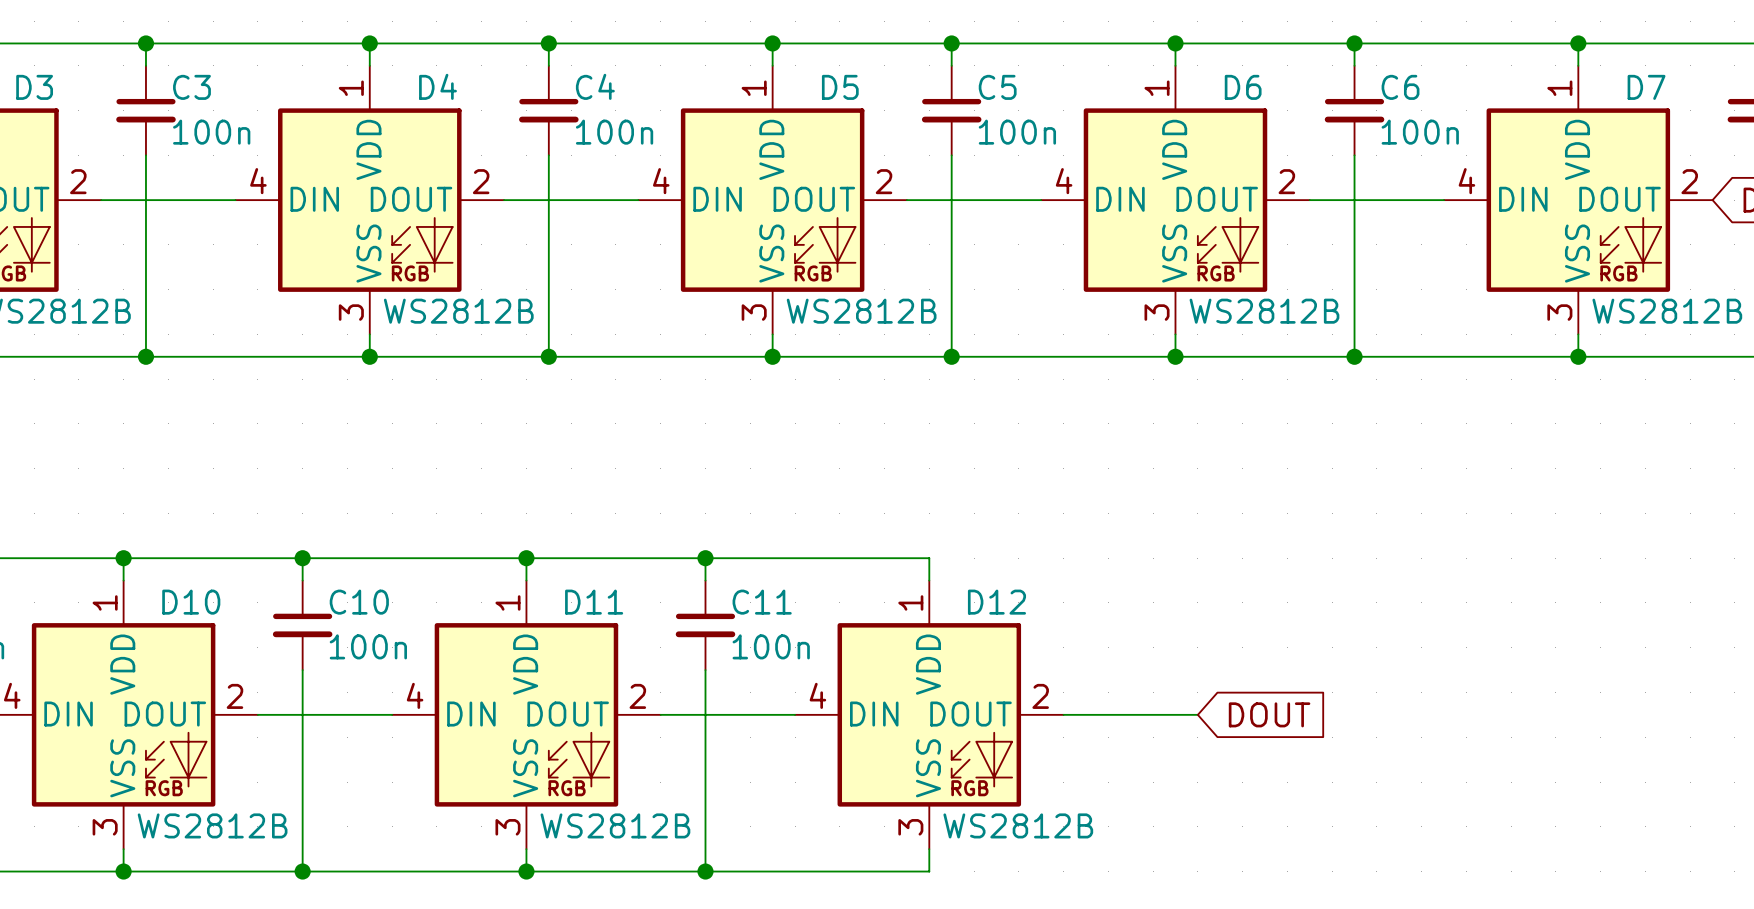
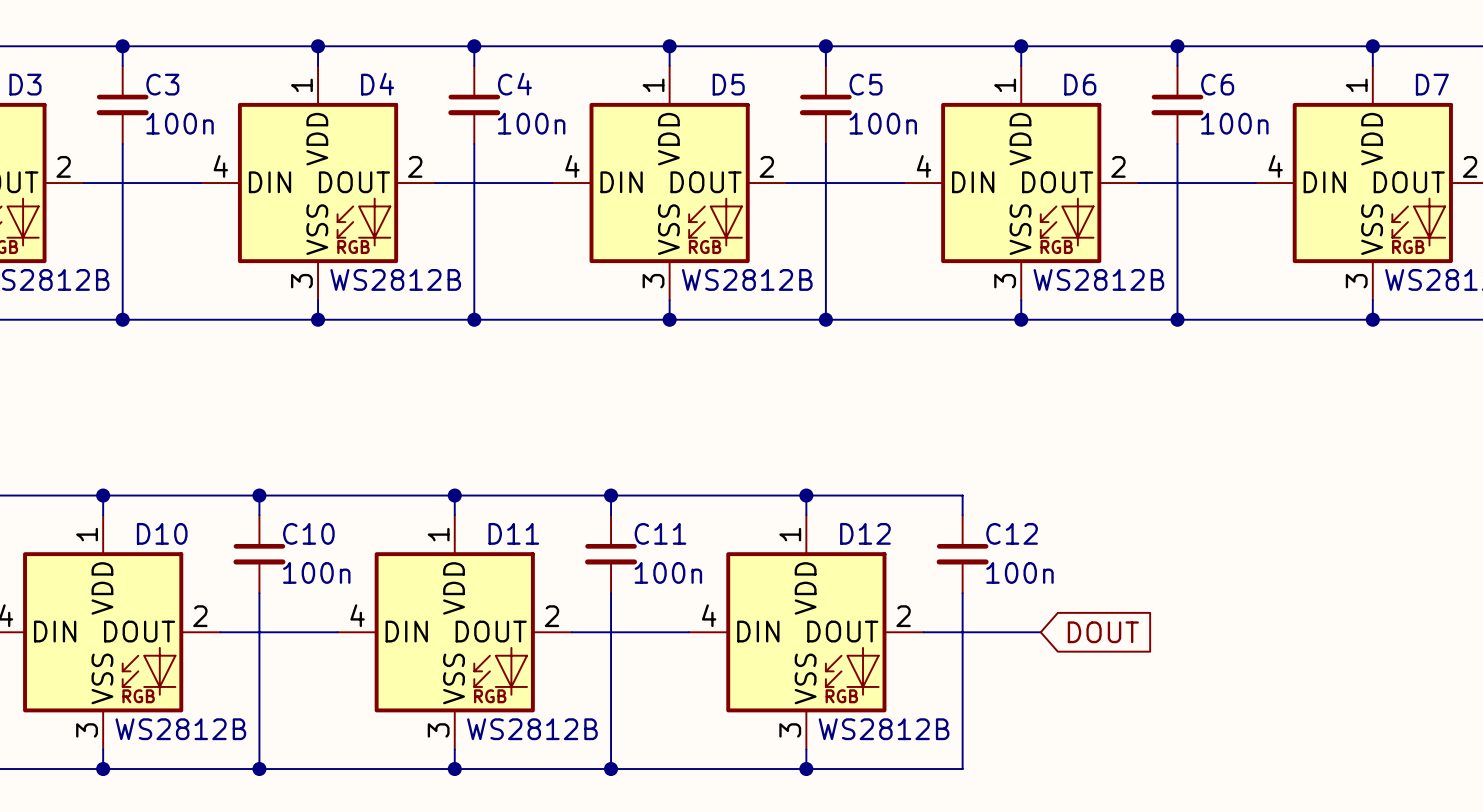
wire: none -> (806, 495) (962, 495) (962, 515)
junction: none -> (806, 495)
C12: none -> 100n (962, 554)
wire: none -> (962, 593) (962, 769) (806, 769)
junction: none -> (806, 769)

